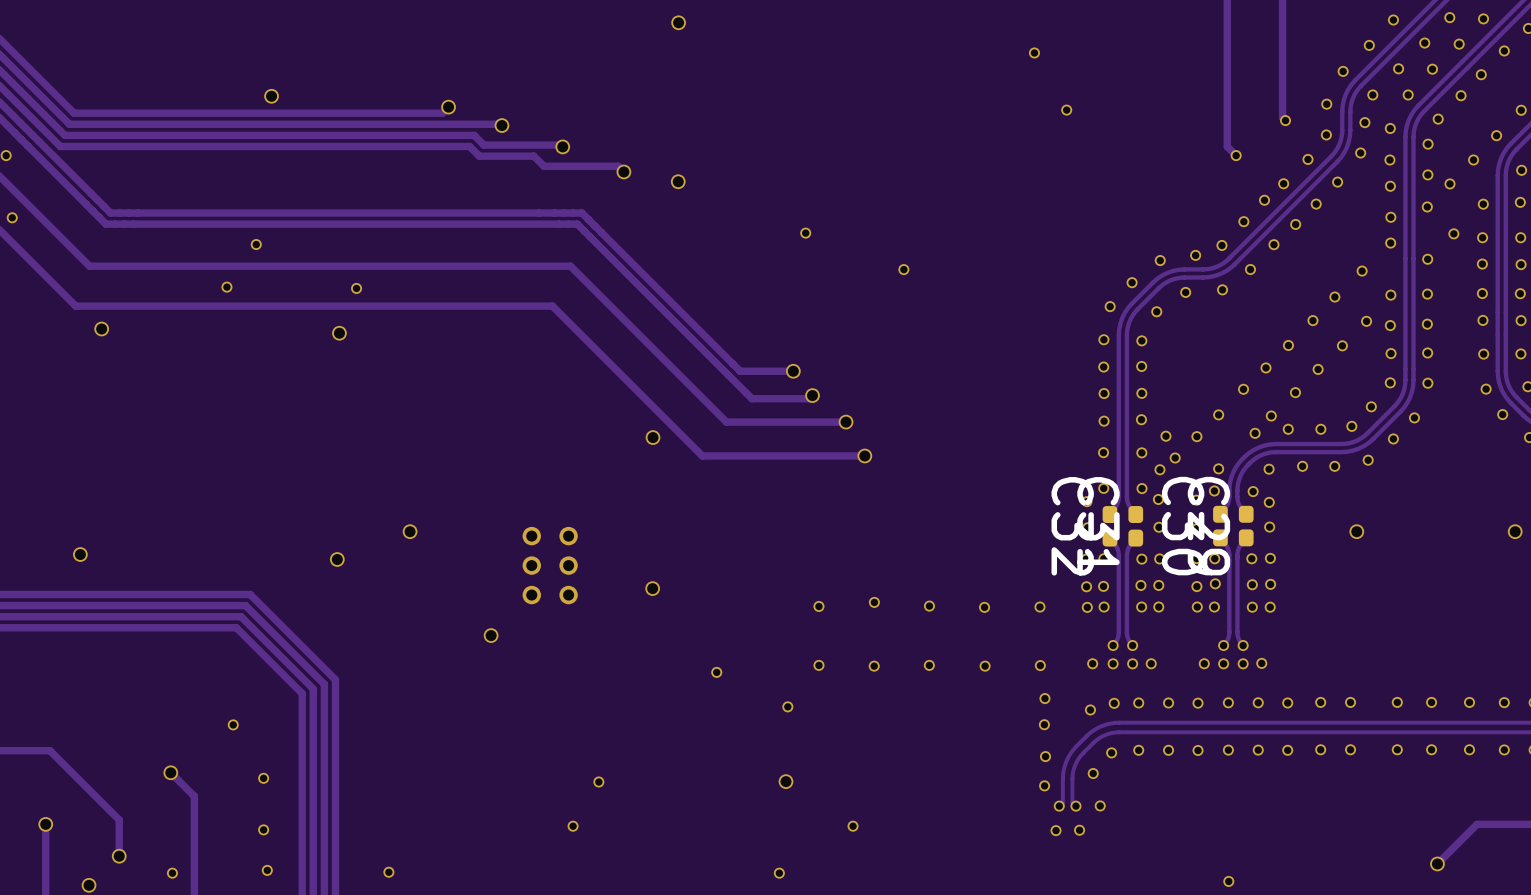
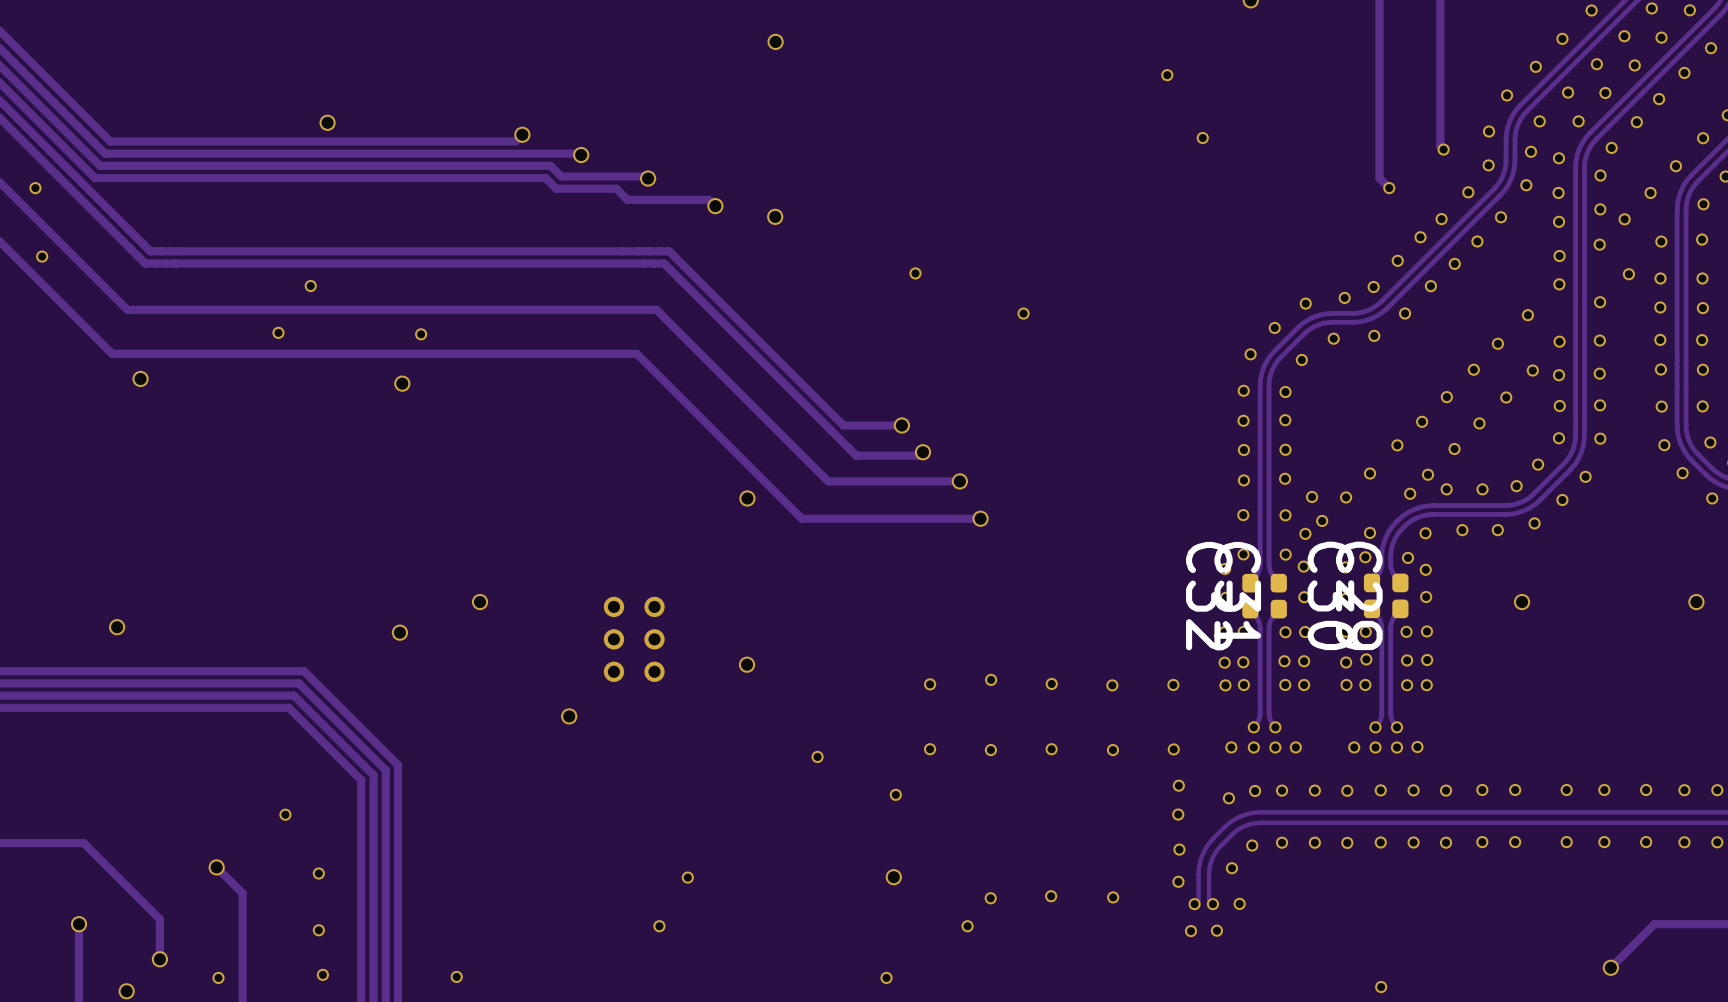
via: none -> (1051, 896)
via: none -> (990, 898)
via: none -> (1113, 897)

